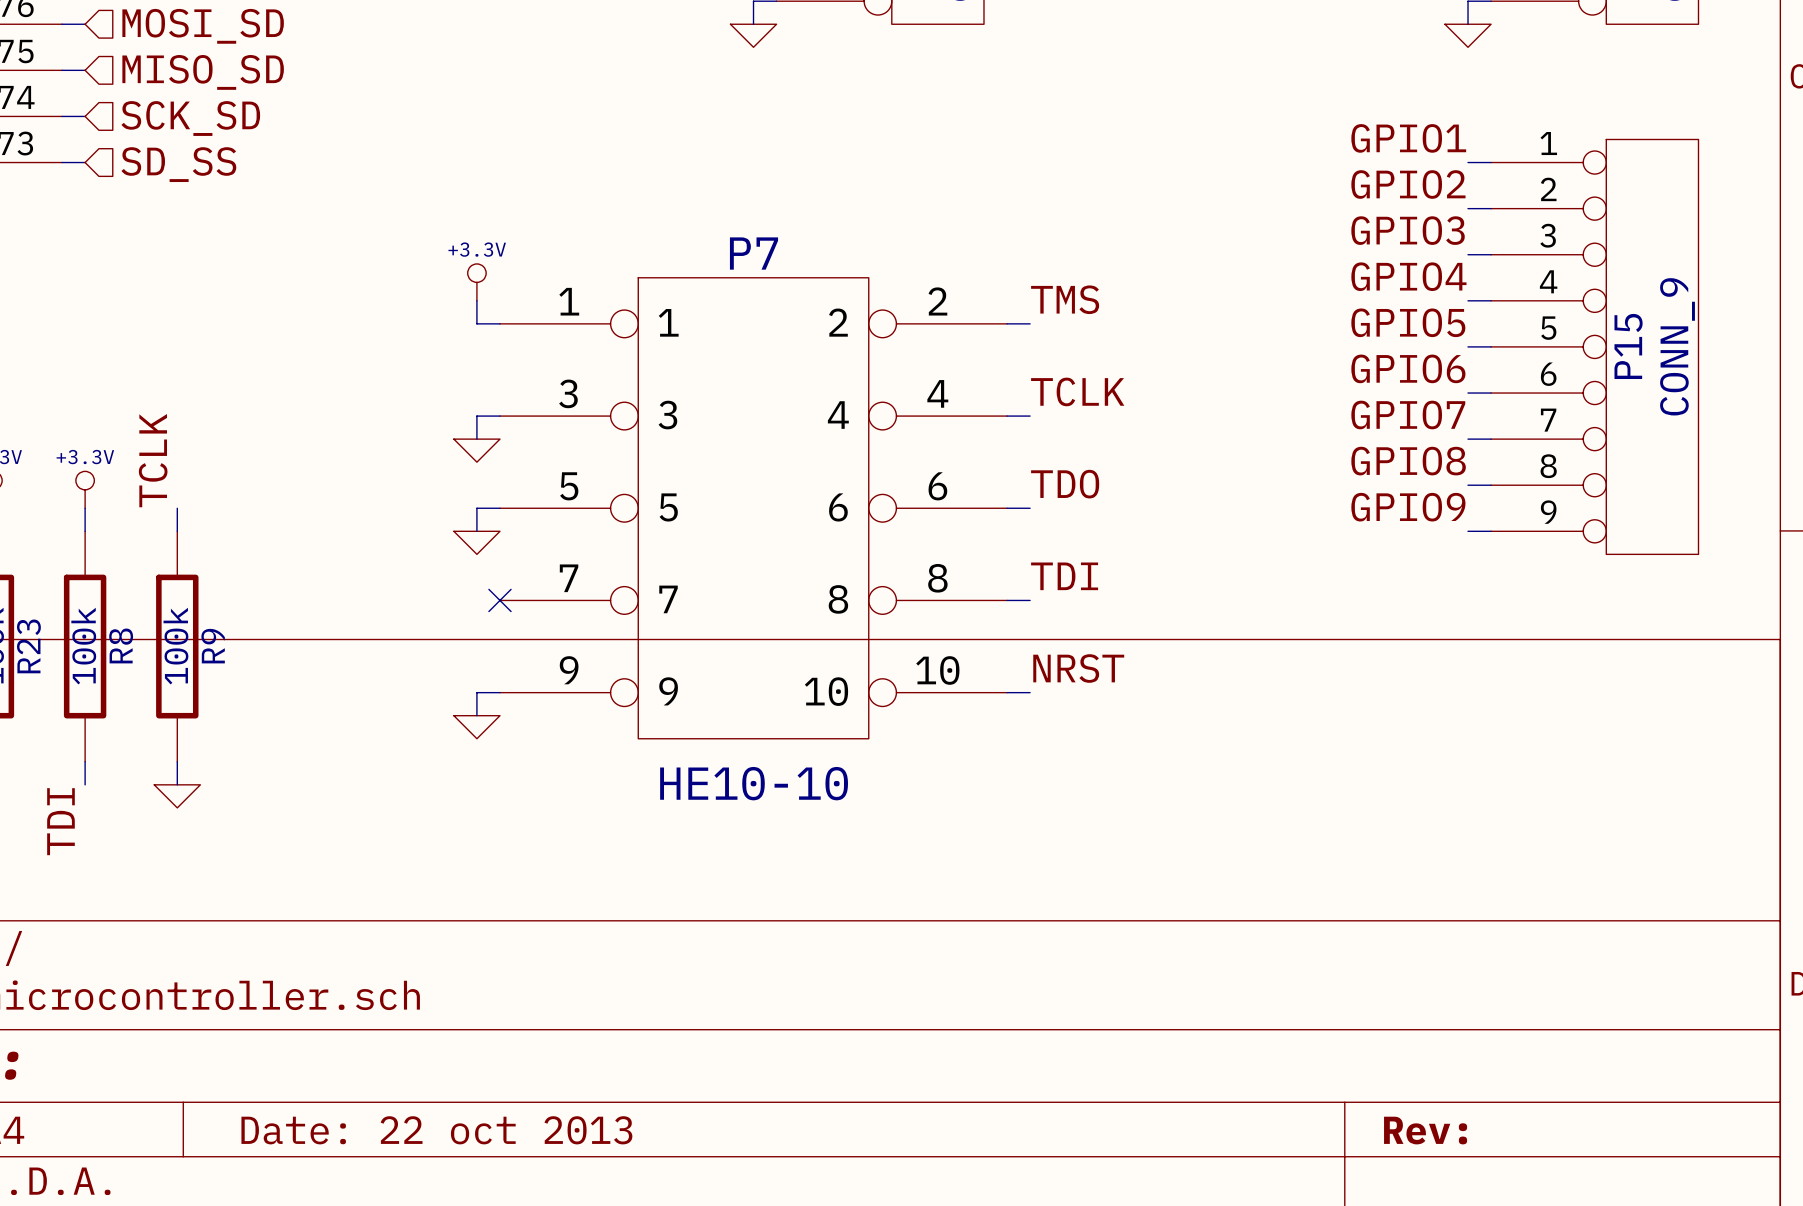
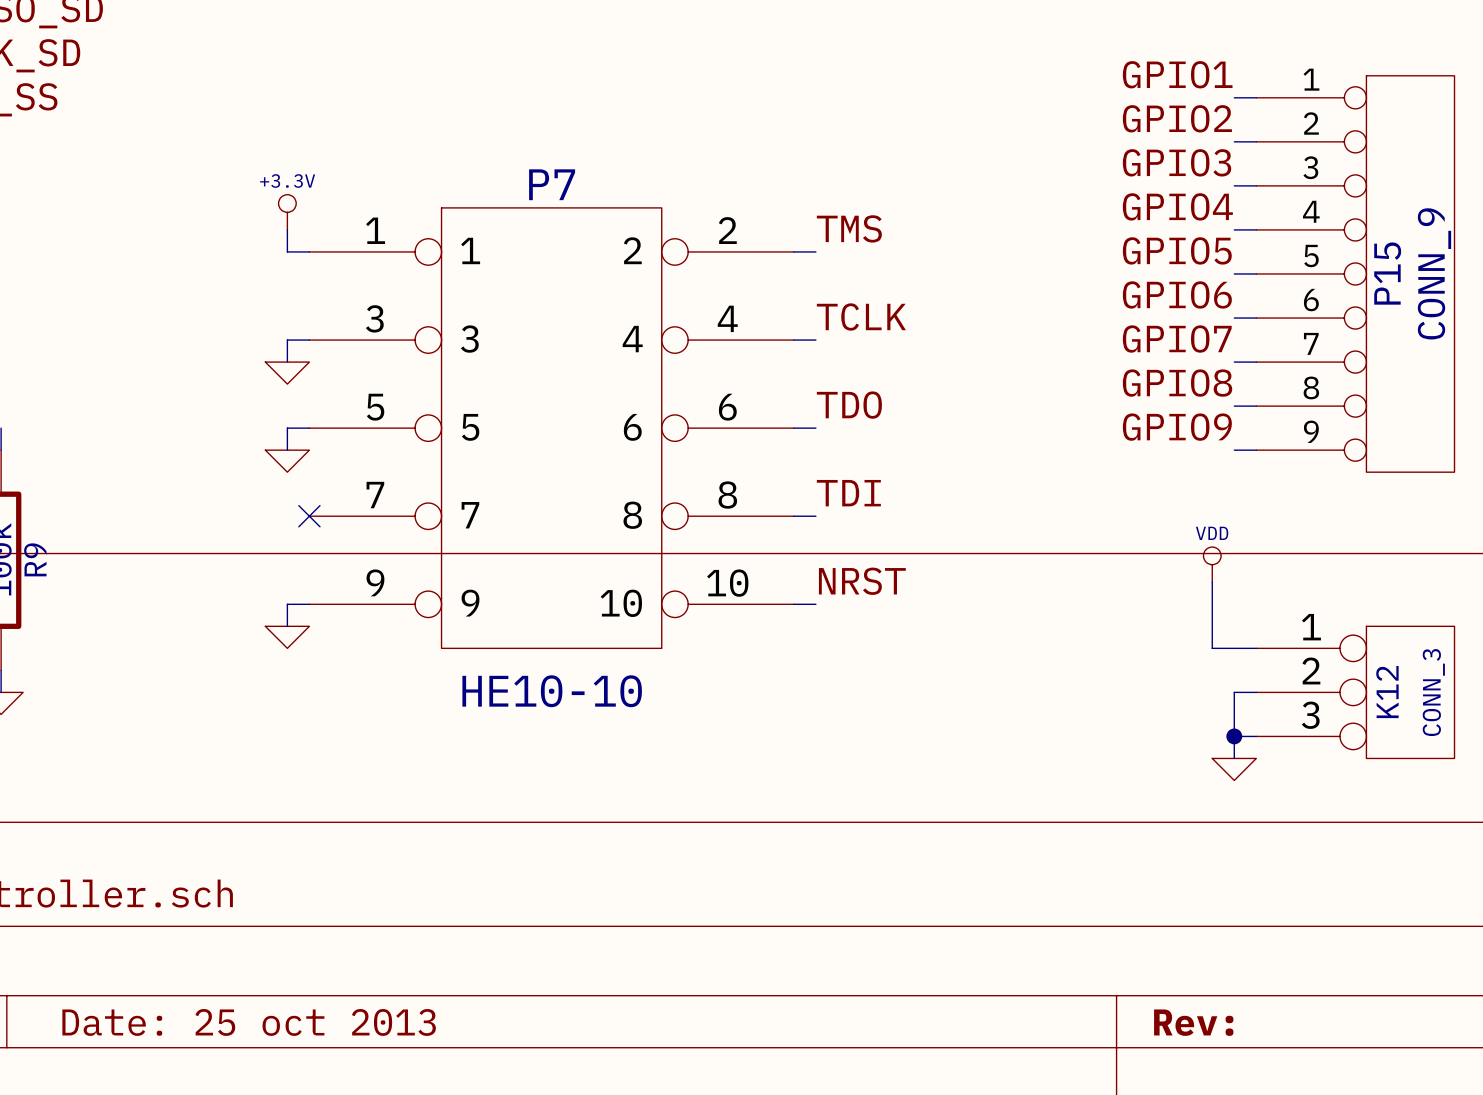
power symbol: none -> VDD (1212, 564)
wire: none -> (1212, 582) (1212, 648) (1256, 648)
wire: none -> (1256, 692) (1234, 692) (1234, 758)
K12: none -> CONN_3 (1355, 692)
wire: none -> (1234, 736) (1256, 736)
junction: none -> (1234, 736)
power symbol: none -> (1234, 769)
title block: Date: 22 oct 2013 (436, 1130) -> Date: 25 oct 2013 (249, 1022)

